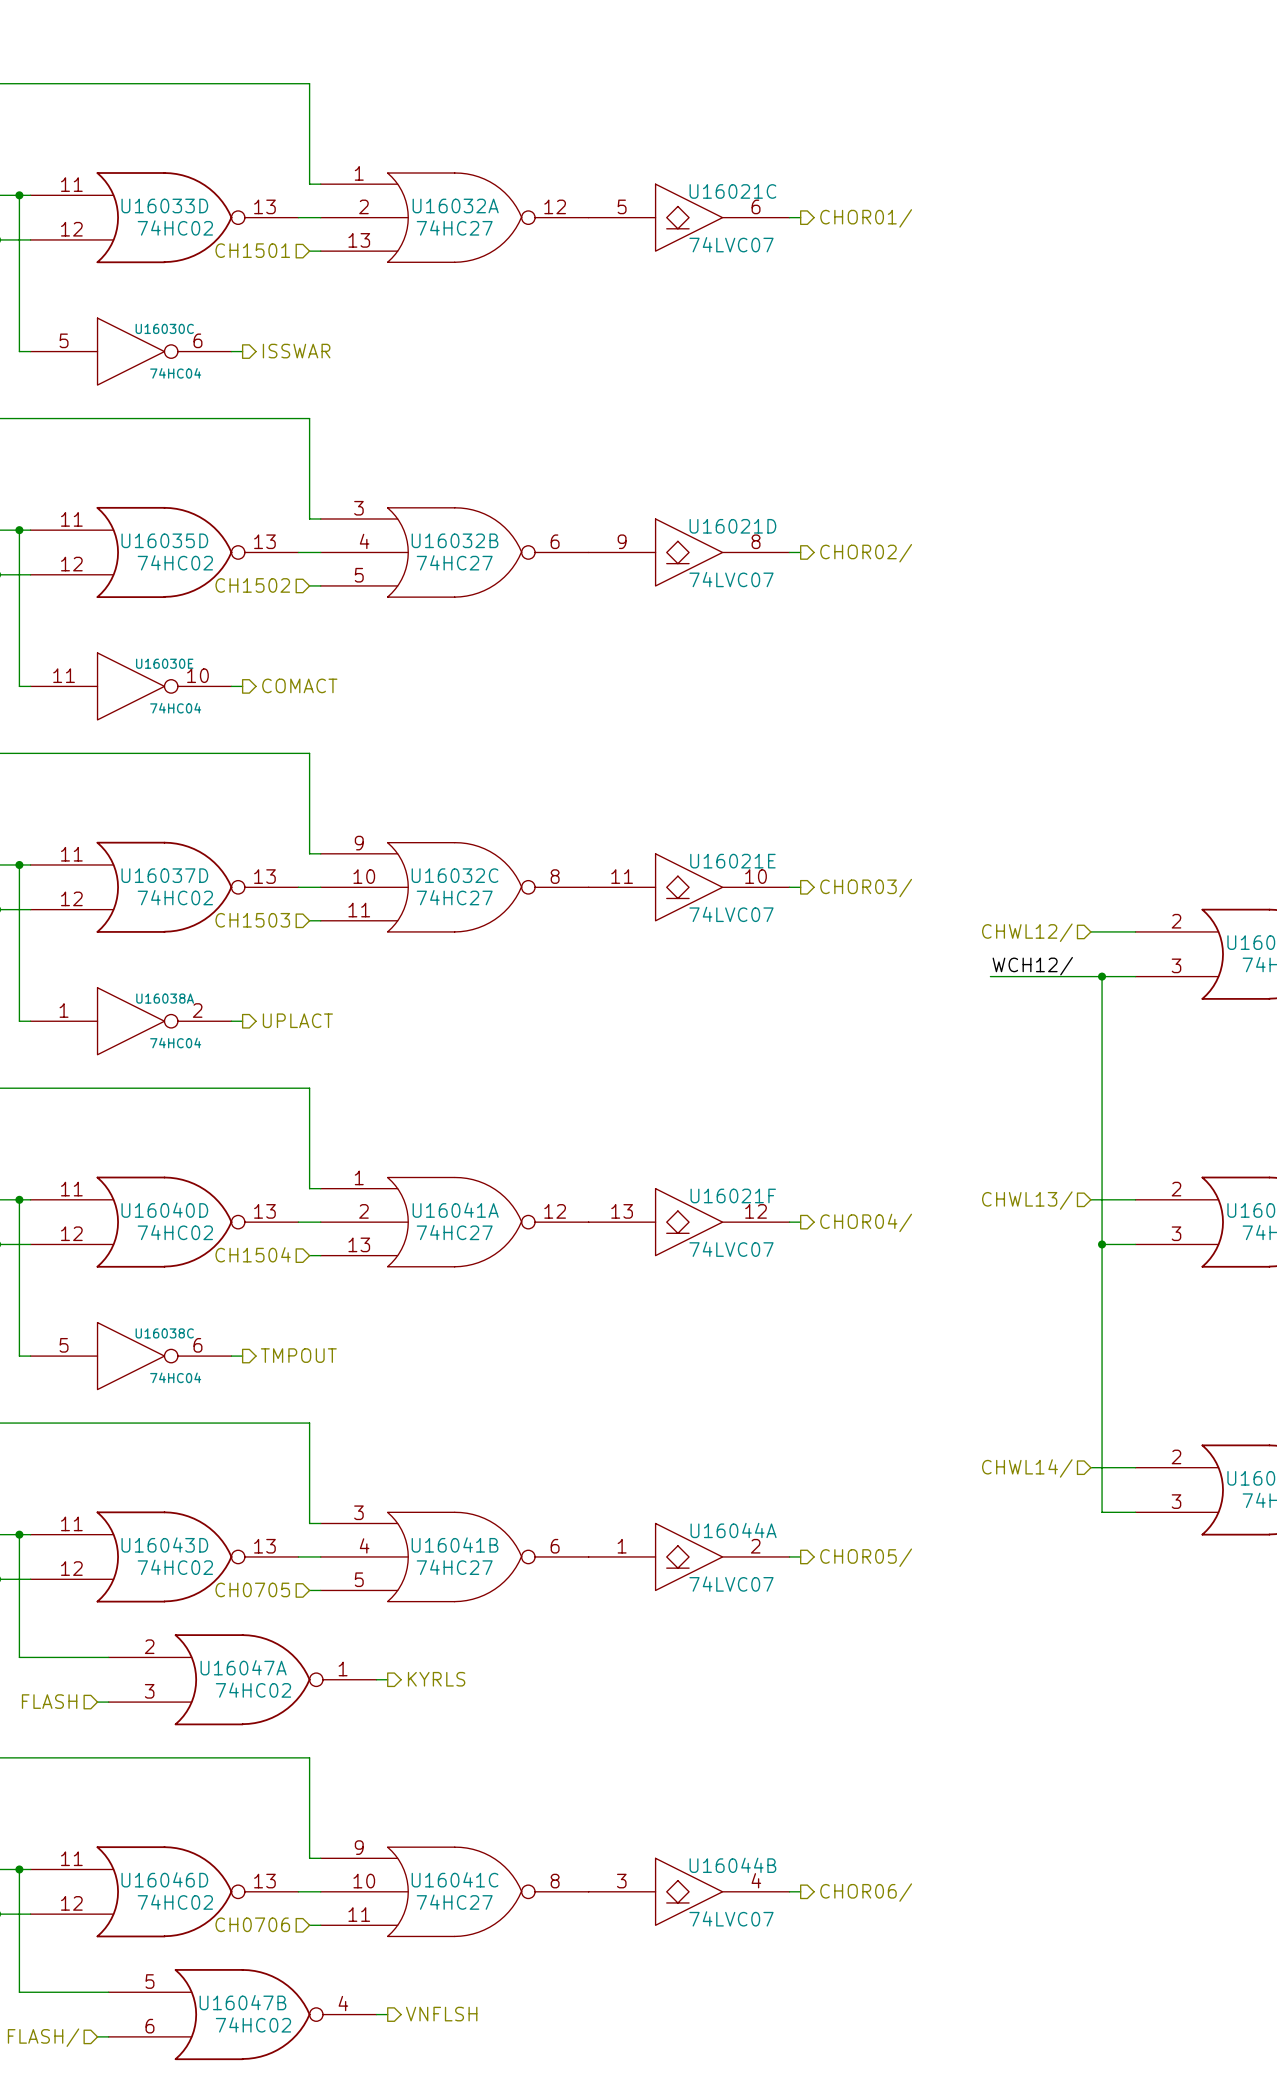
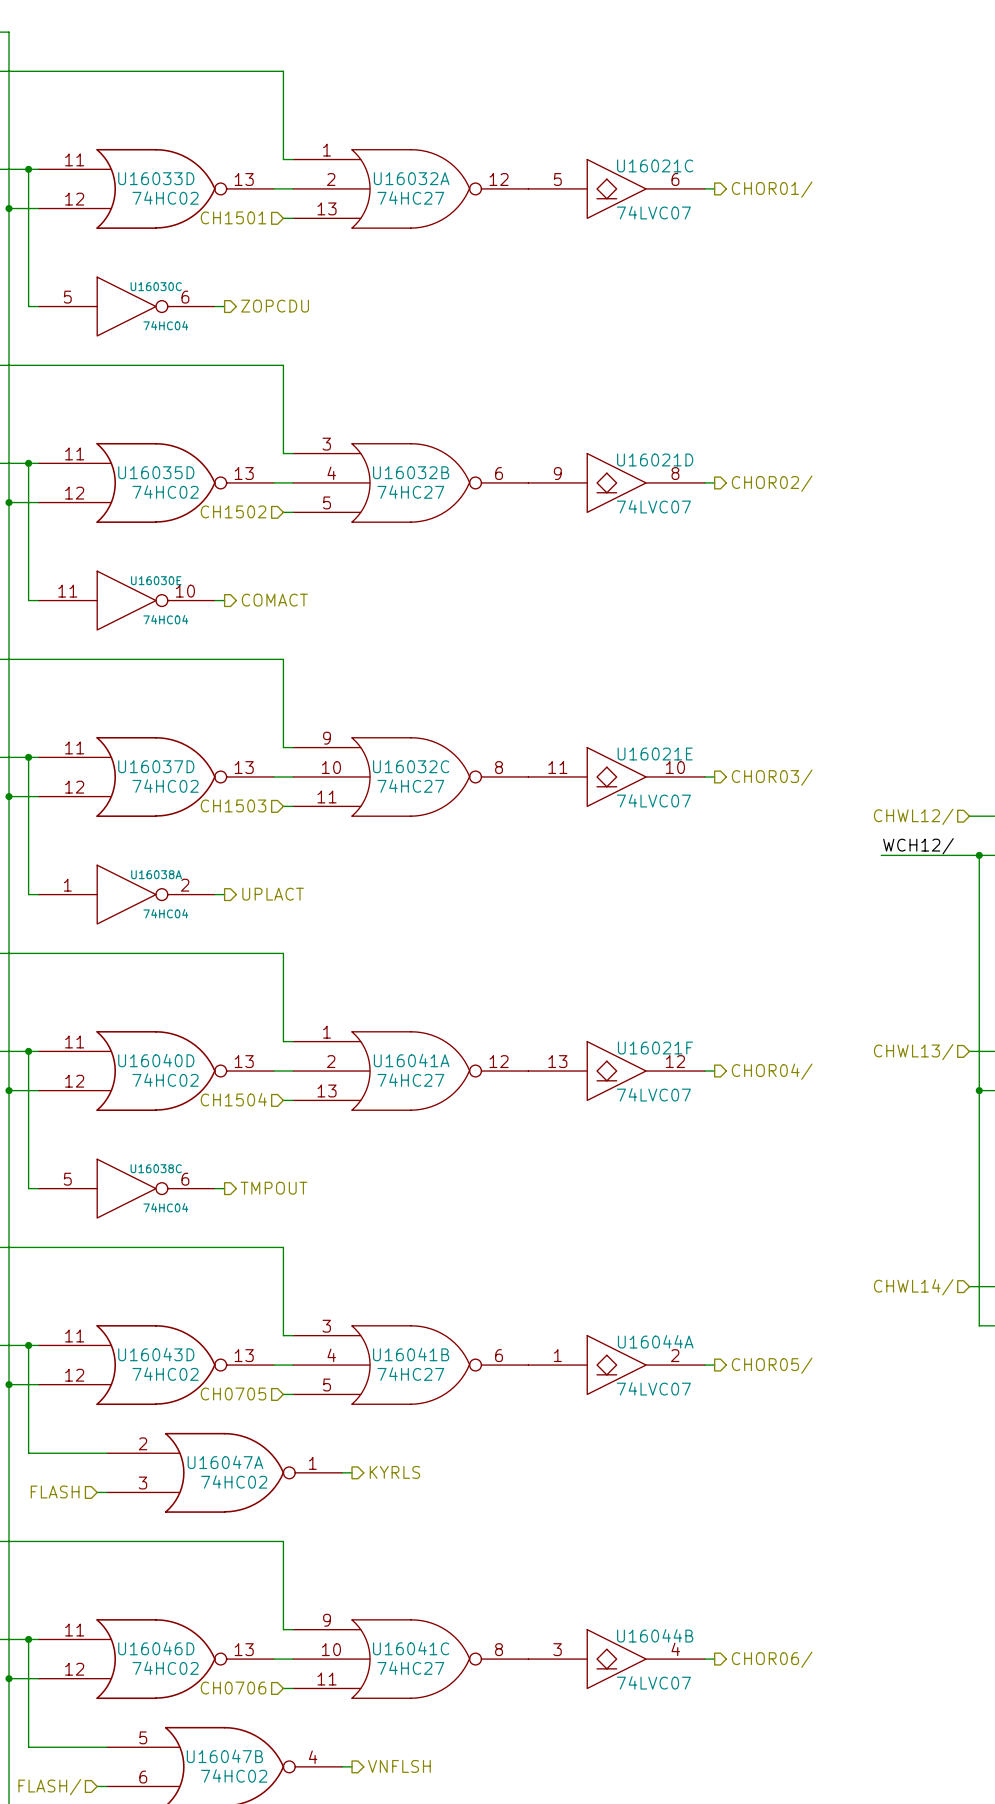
hierarchical label: ISSWAR (296, 351) -> ZOPCDU (275, 306)

